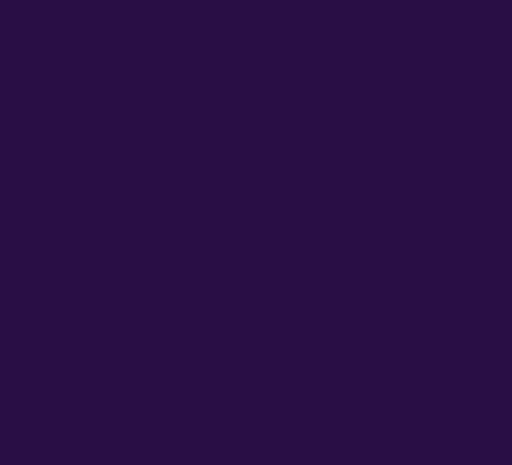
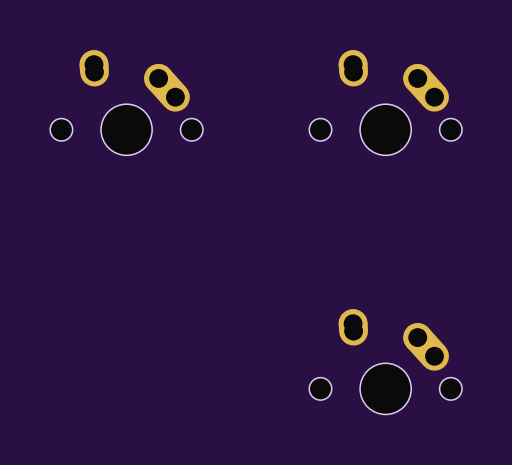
part: none -> (126, 102)
part: none -> (385, 102)
part: none -> (385, 361)

